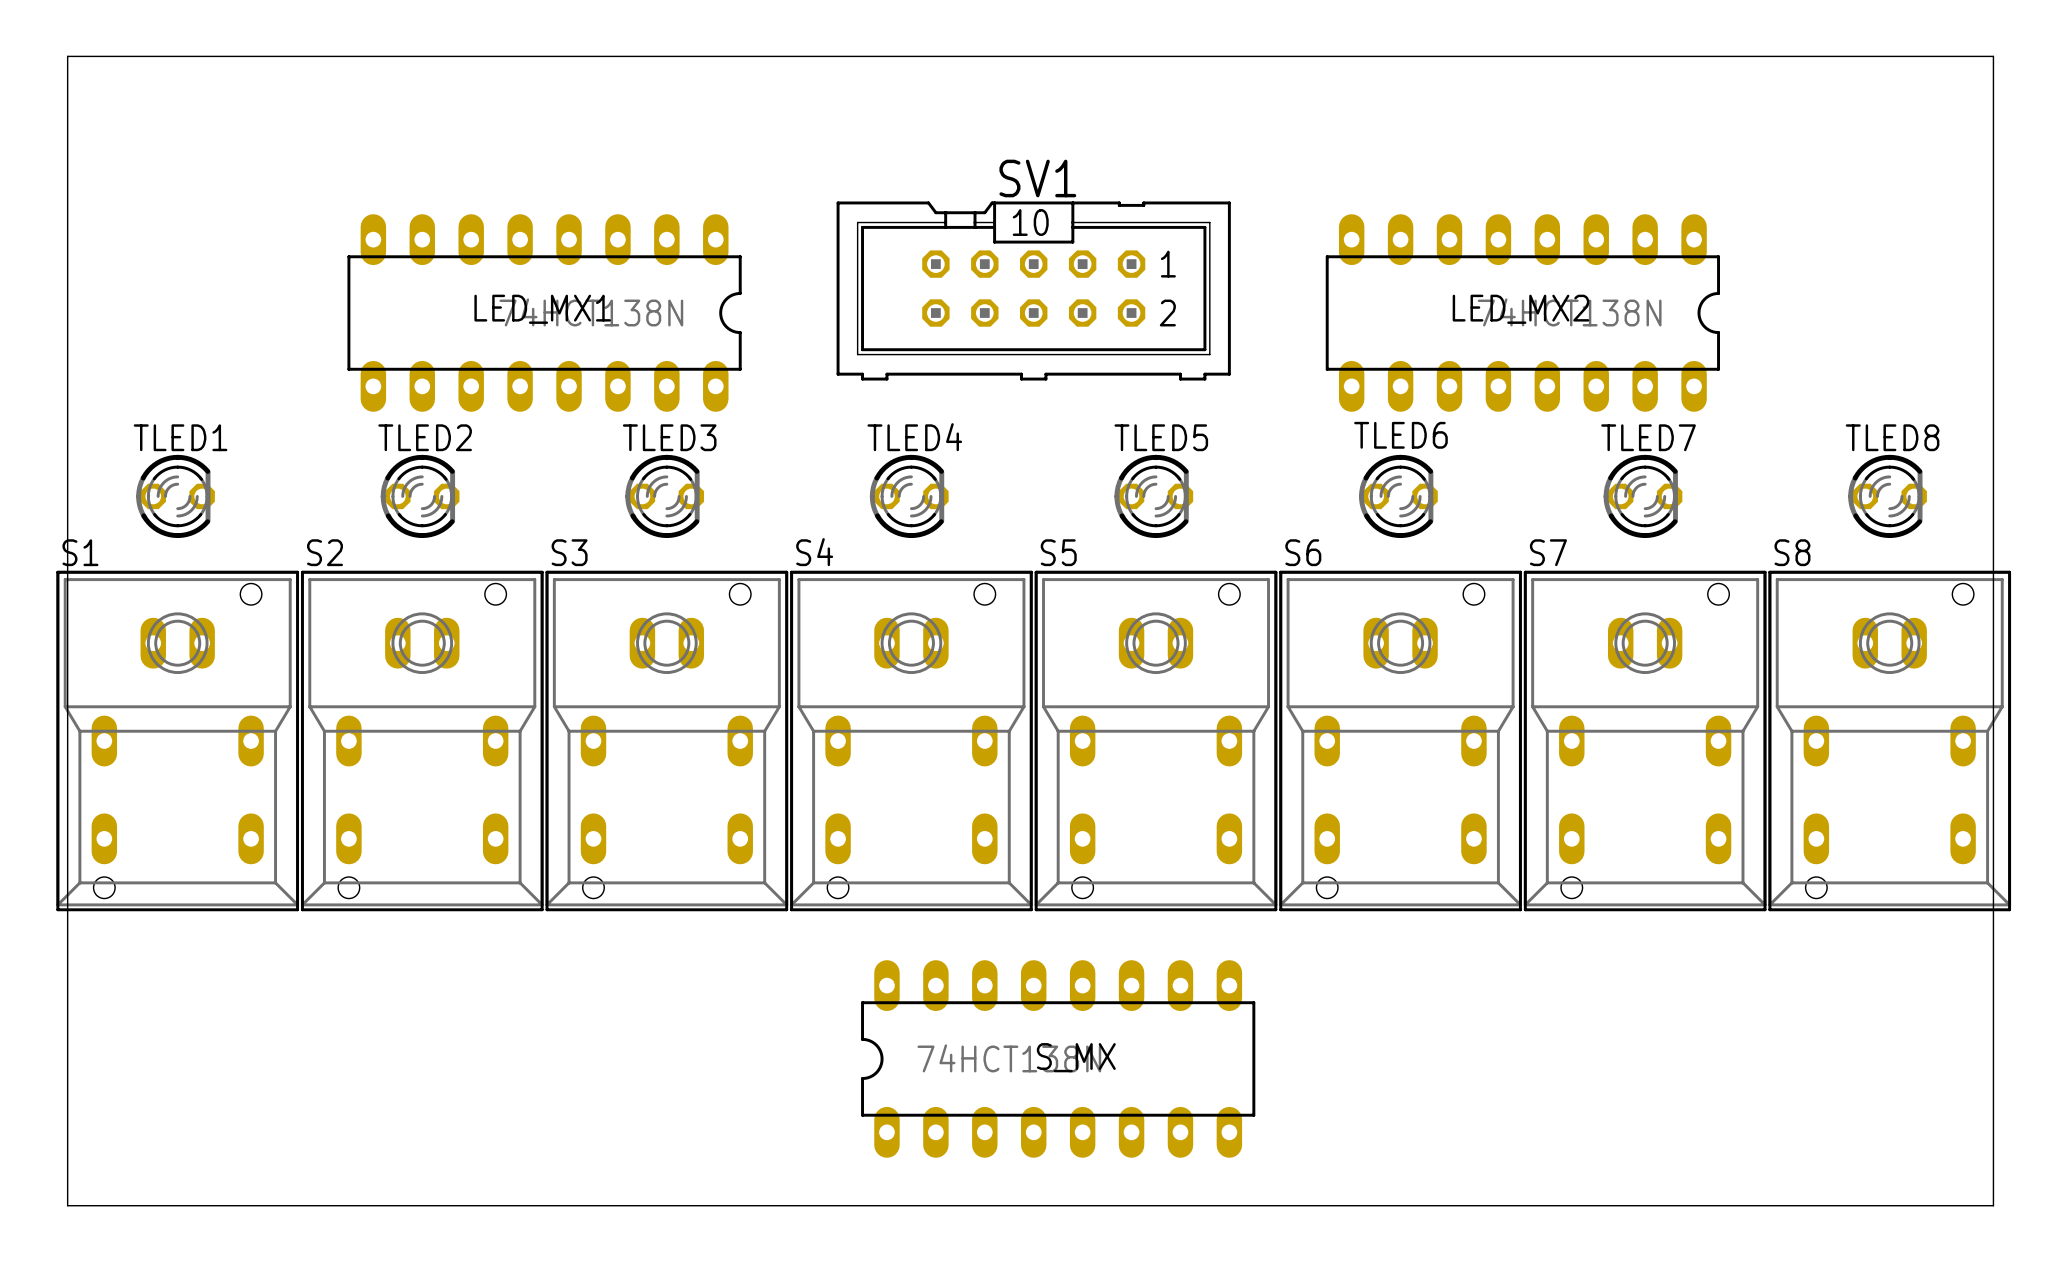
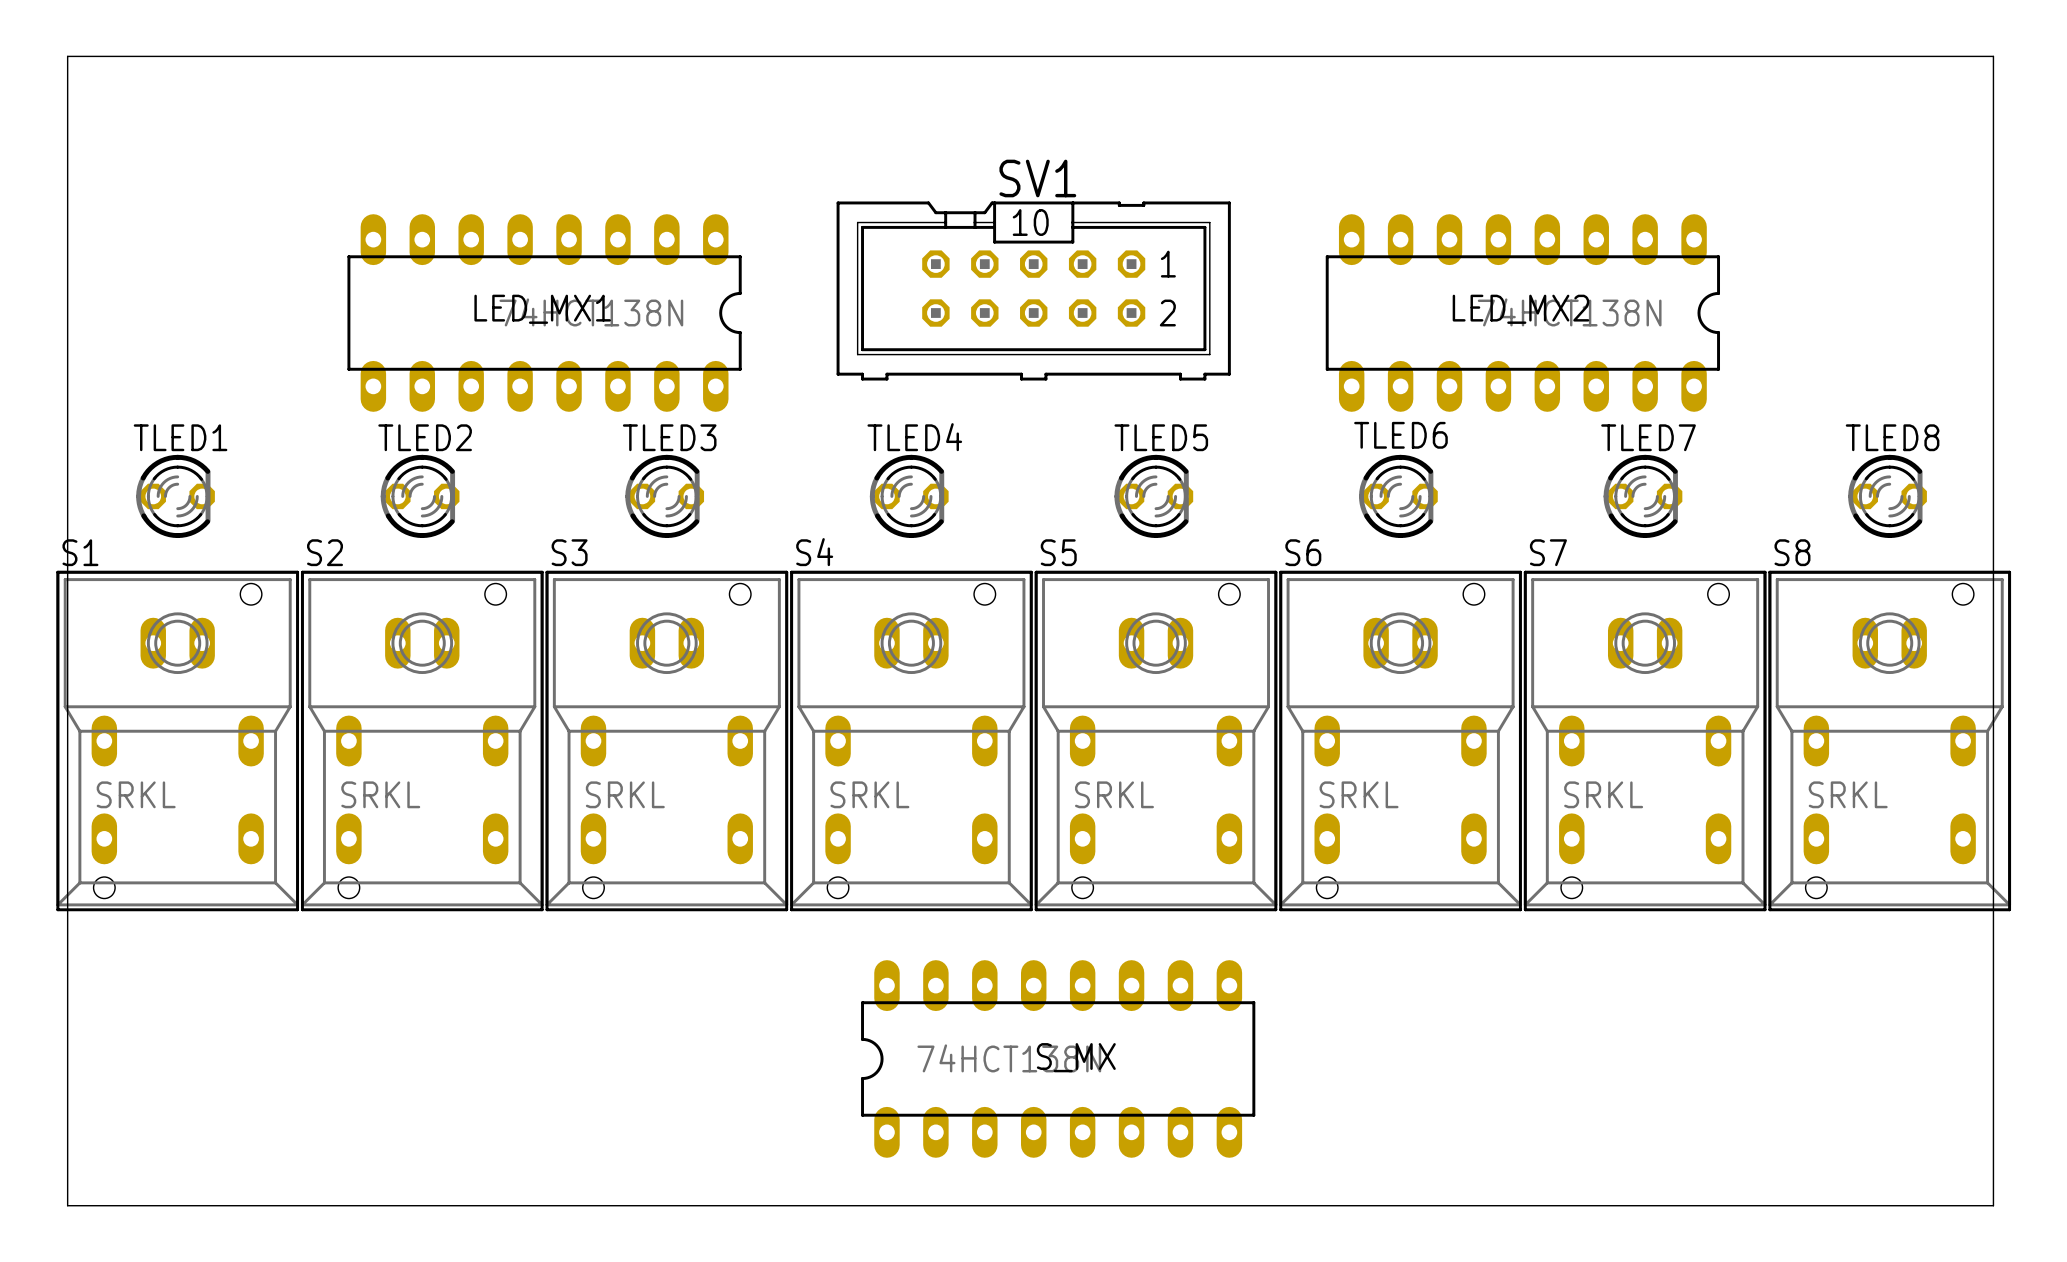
S1 value: none -> SRKL (136, 794)
S2 value: none -> SRKL (380, 794)
S3 value: none -> SRKL (625, 794)
S4 value: none -> SRKL (869, 794)
S5 value: none -> SRKL (1114, 794)
S6 value: none -> SRKL (1359, 794)
S7 value: none -> SRKL (1603, 794)
S8 value: none -> SRKL (1848, 794)

